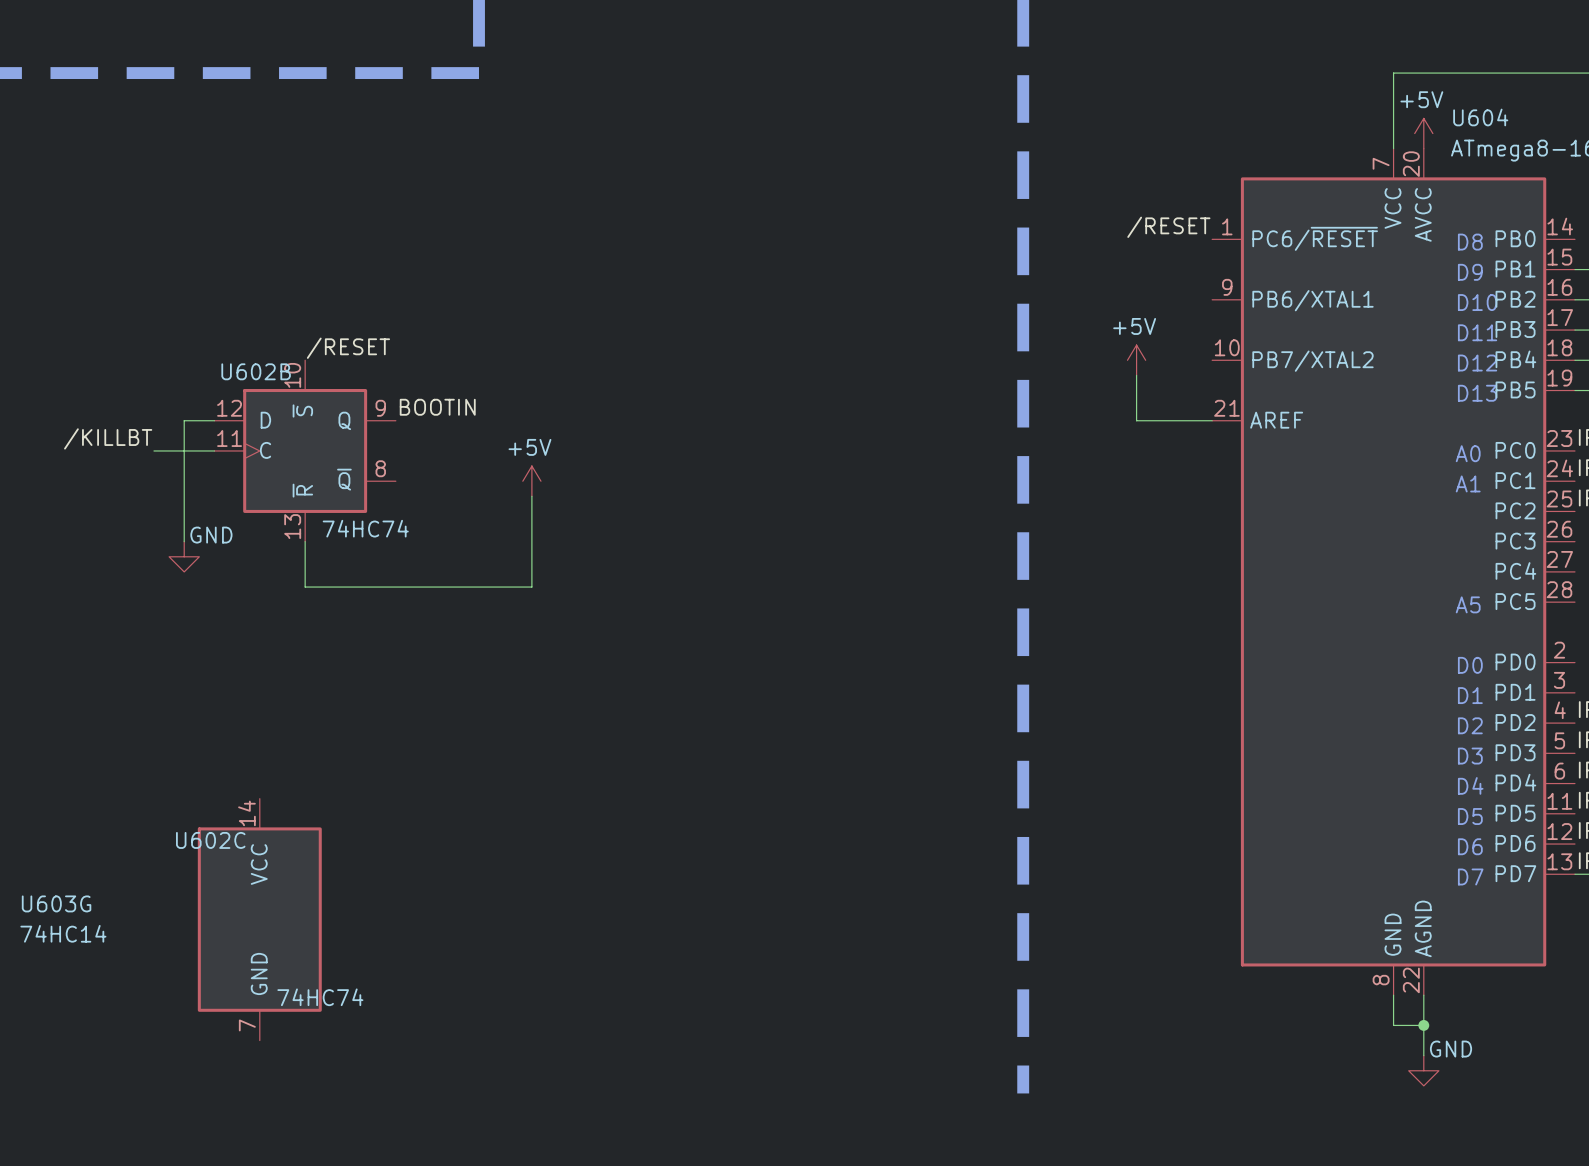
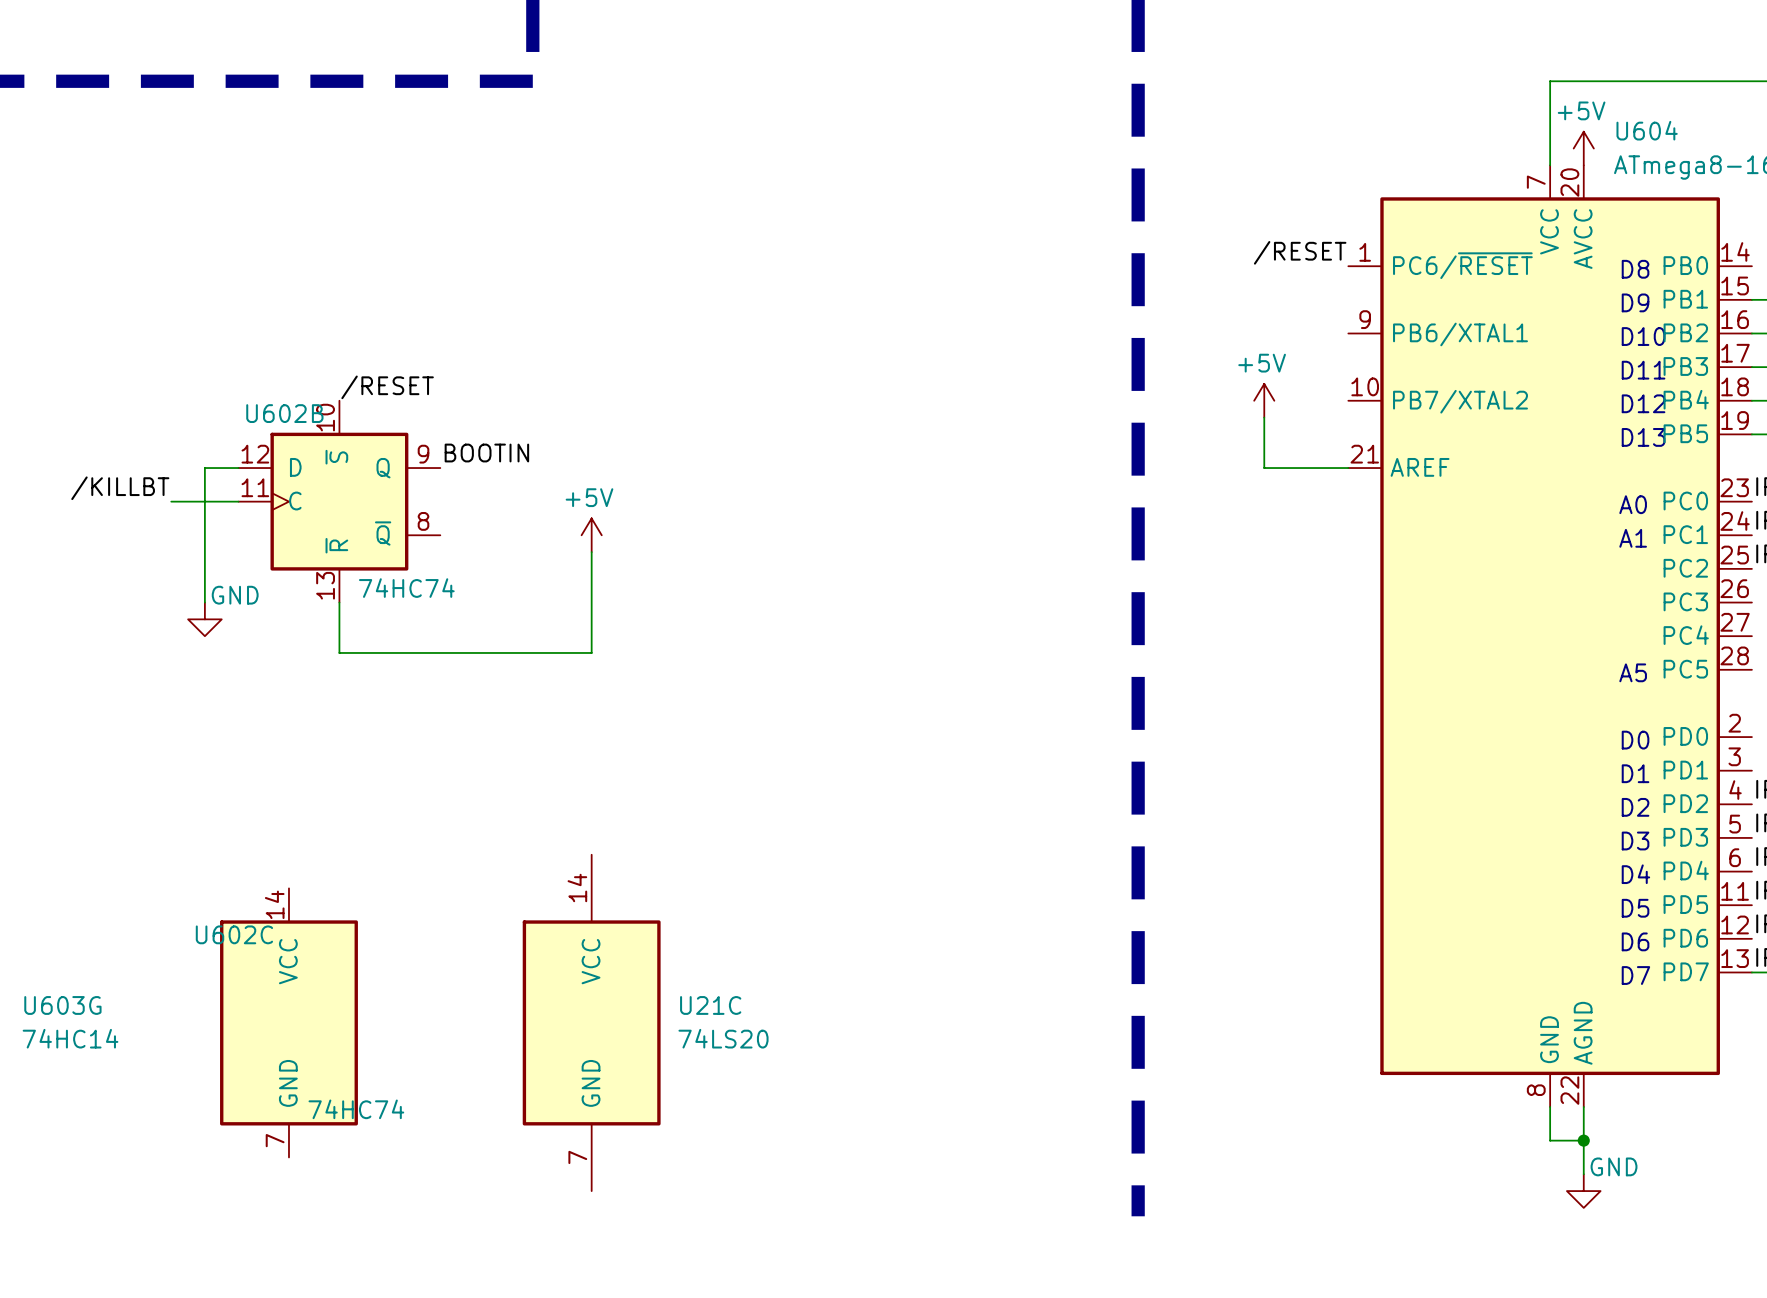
U21C: none -> 74LS20 (591, 1022)

